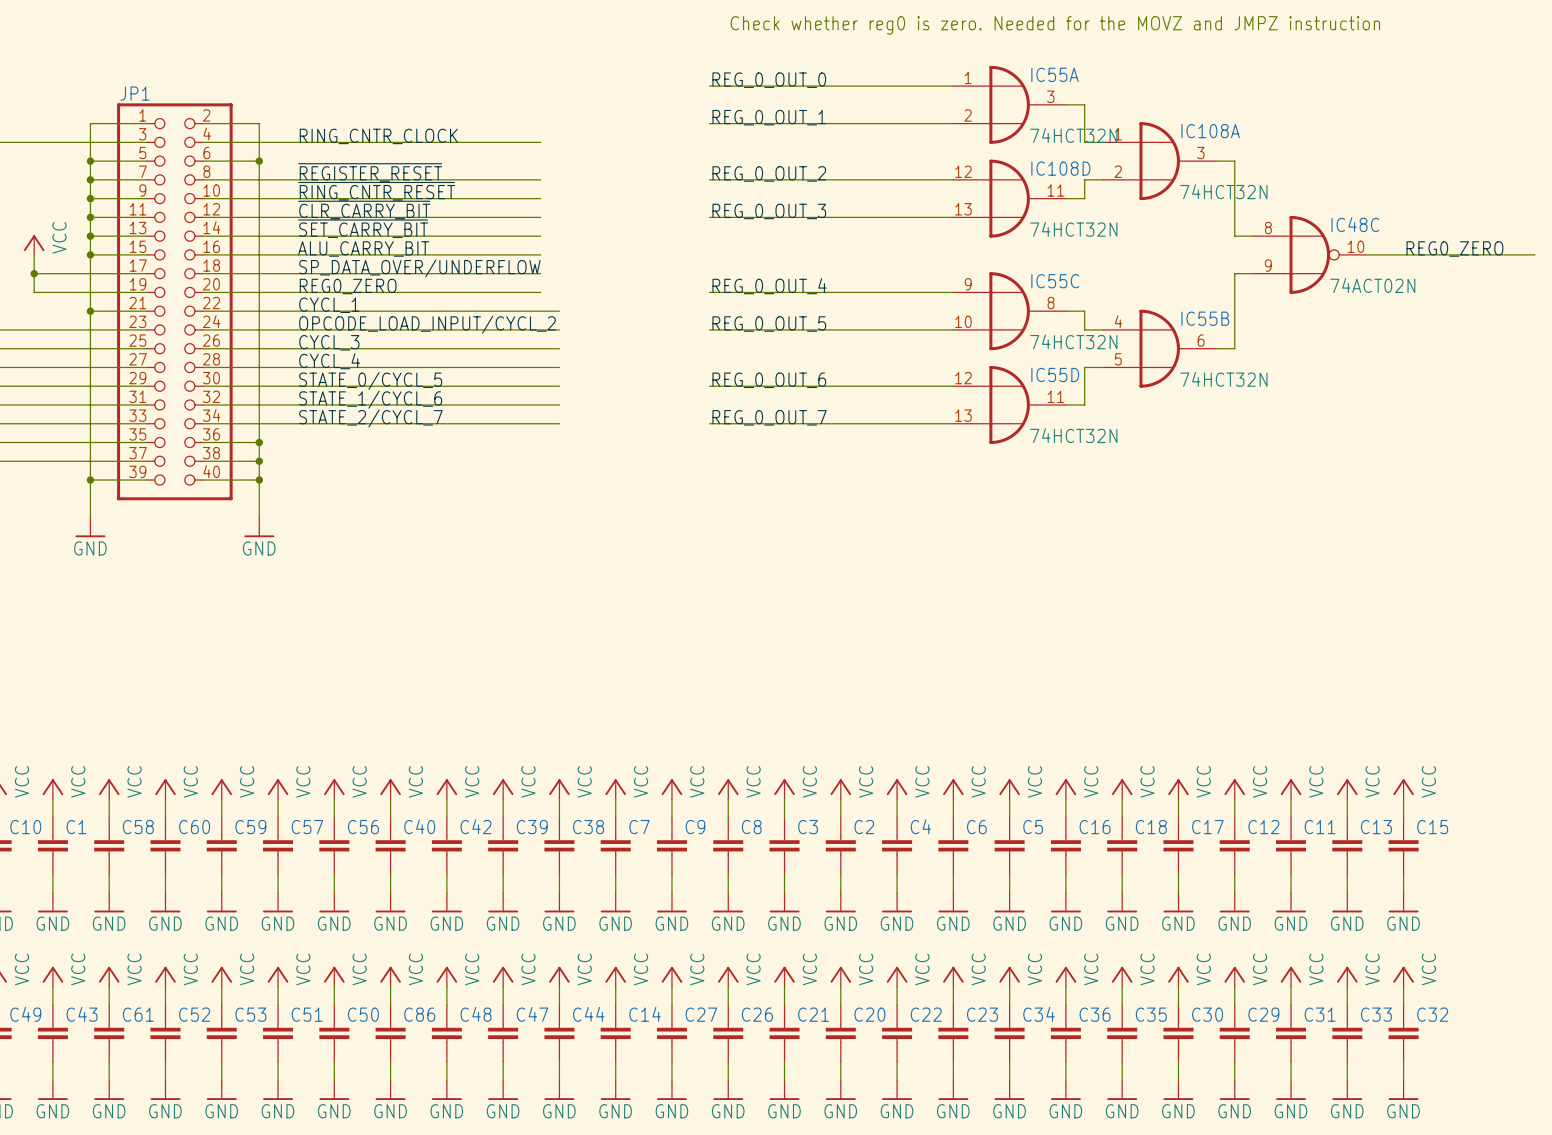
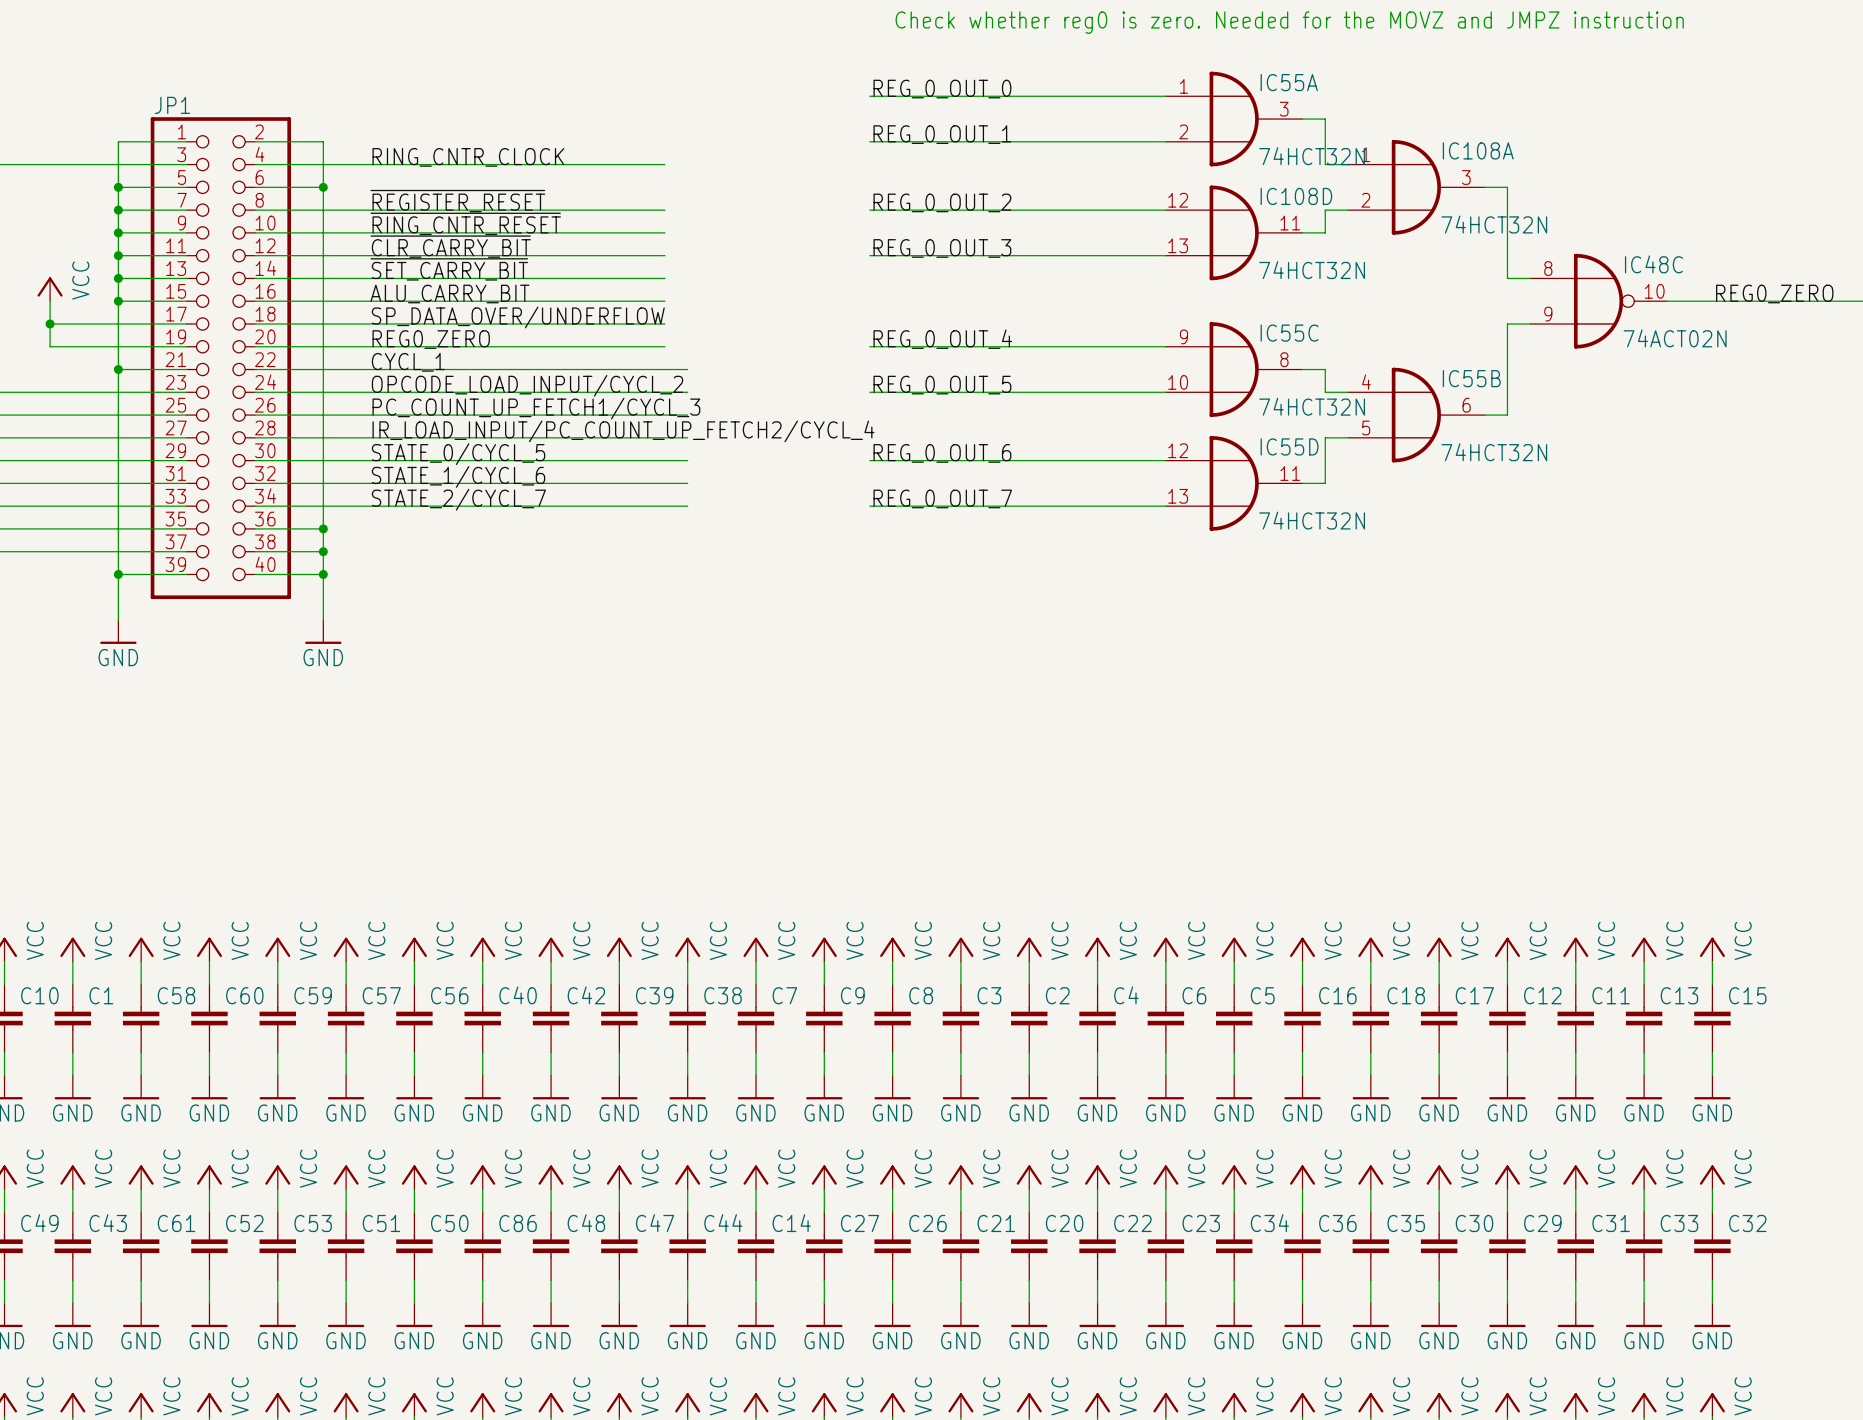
label: CYCL_3 (329, 342) -> PC_COUNT_UP_FETCH1/CYCL_3 (536, 408)
label: CYCL_4 (329, 361) -> IR_LOAD_INPUT/PC_COUNT_UP_FETCH2/CYCL_4 (623, 431)

